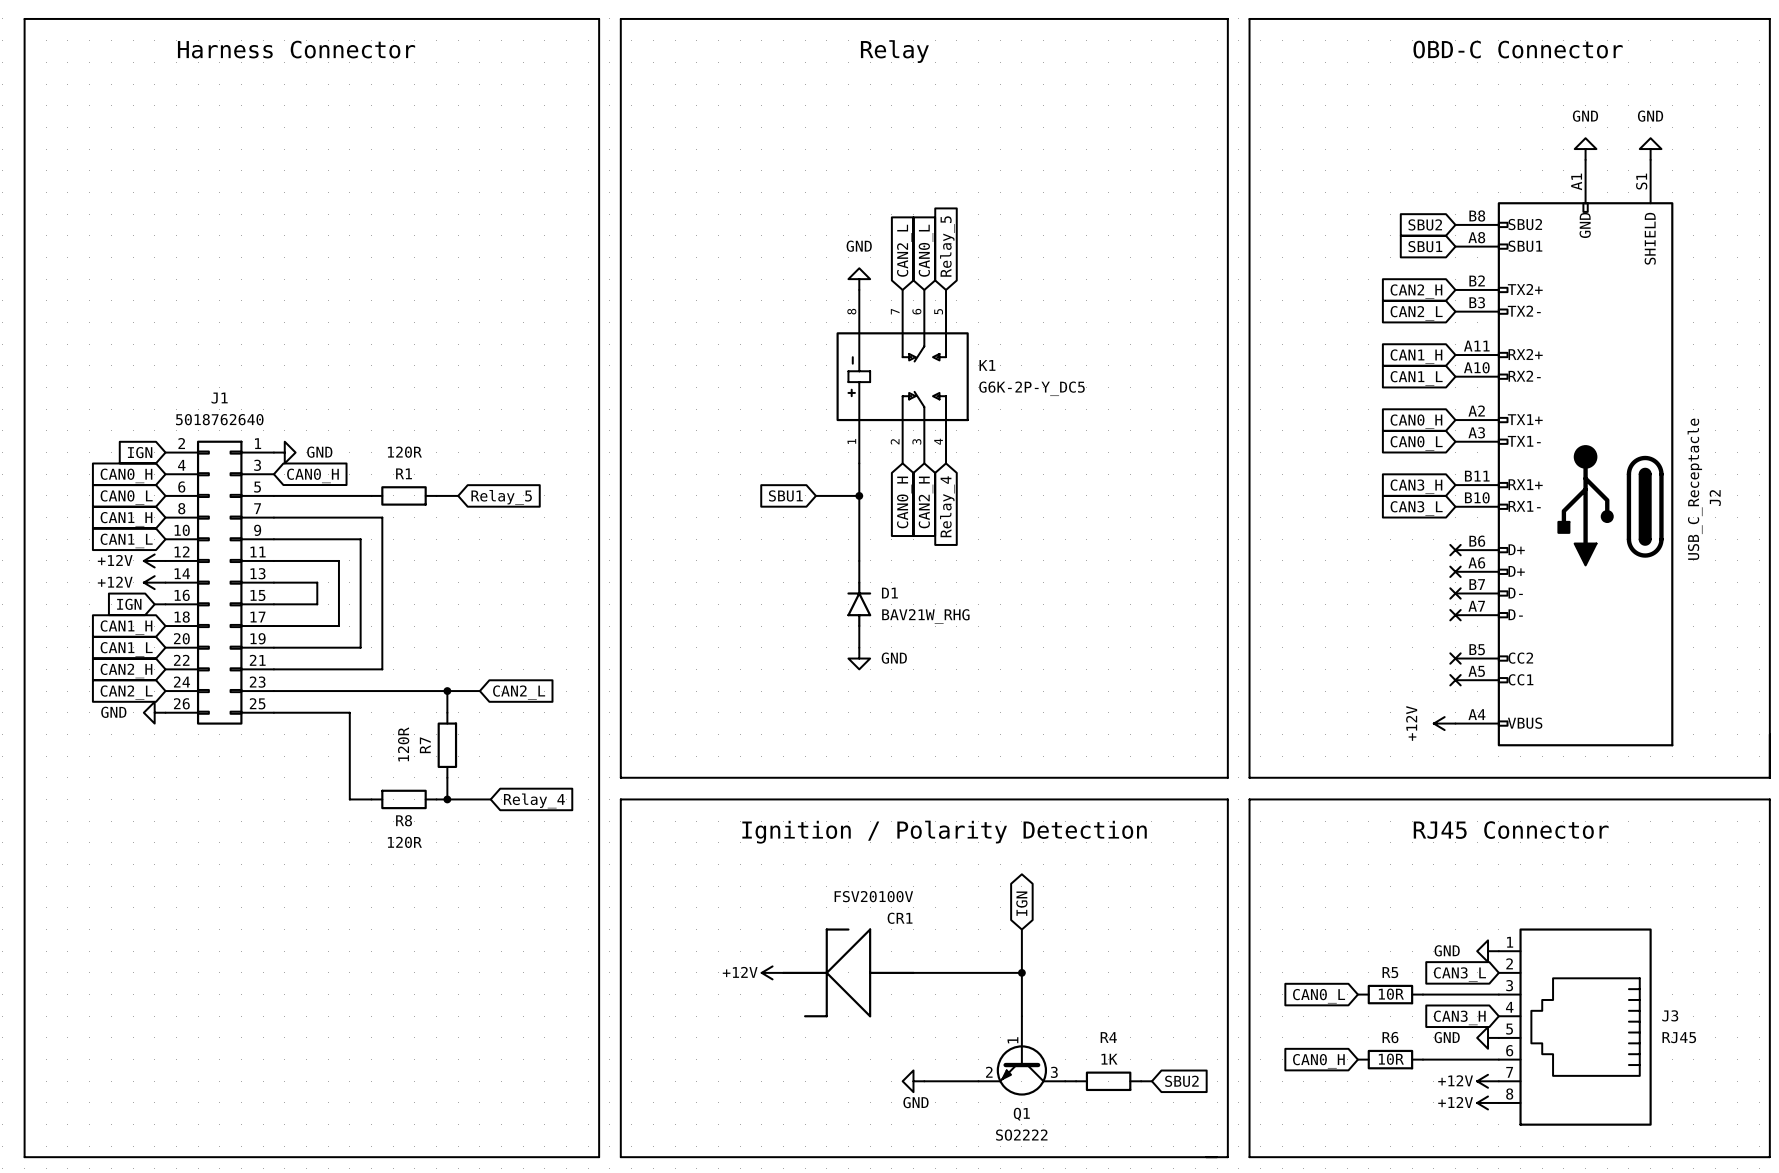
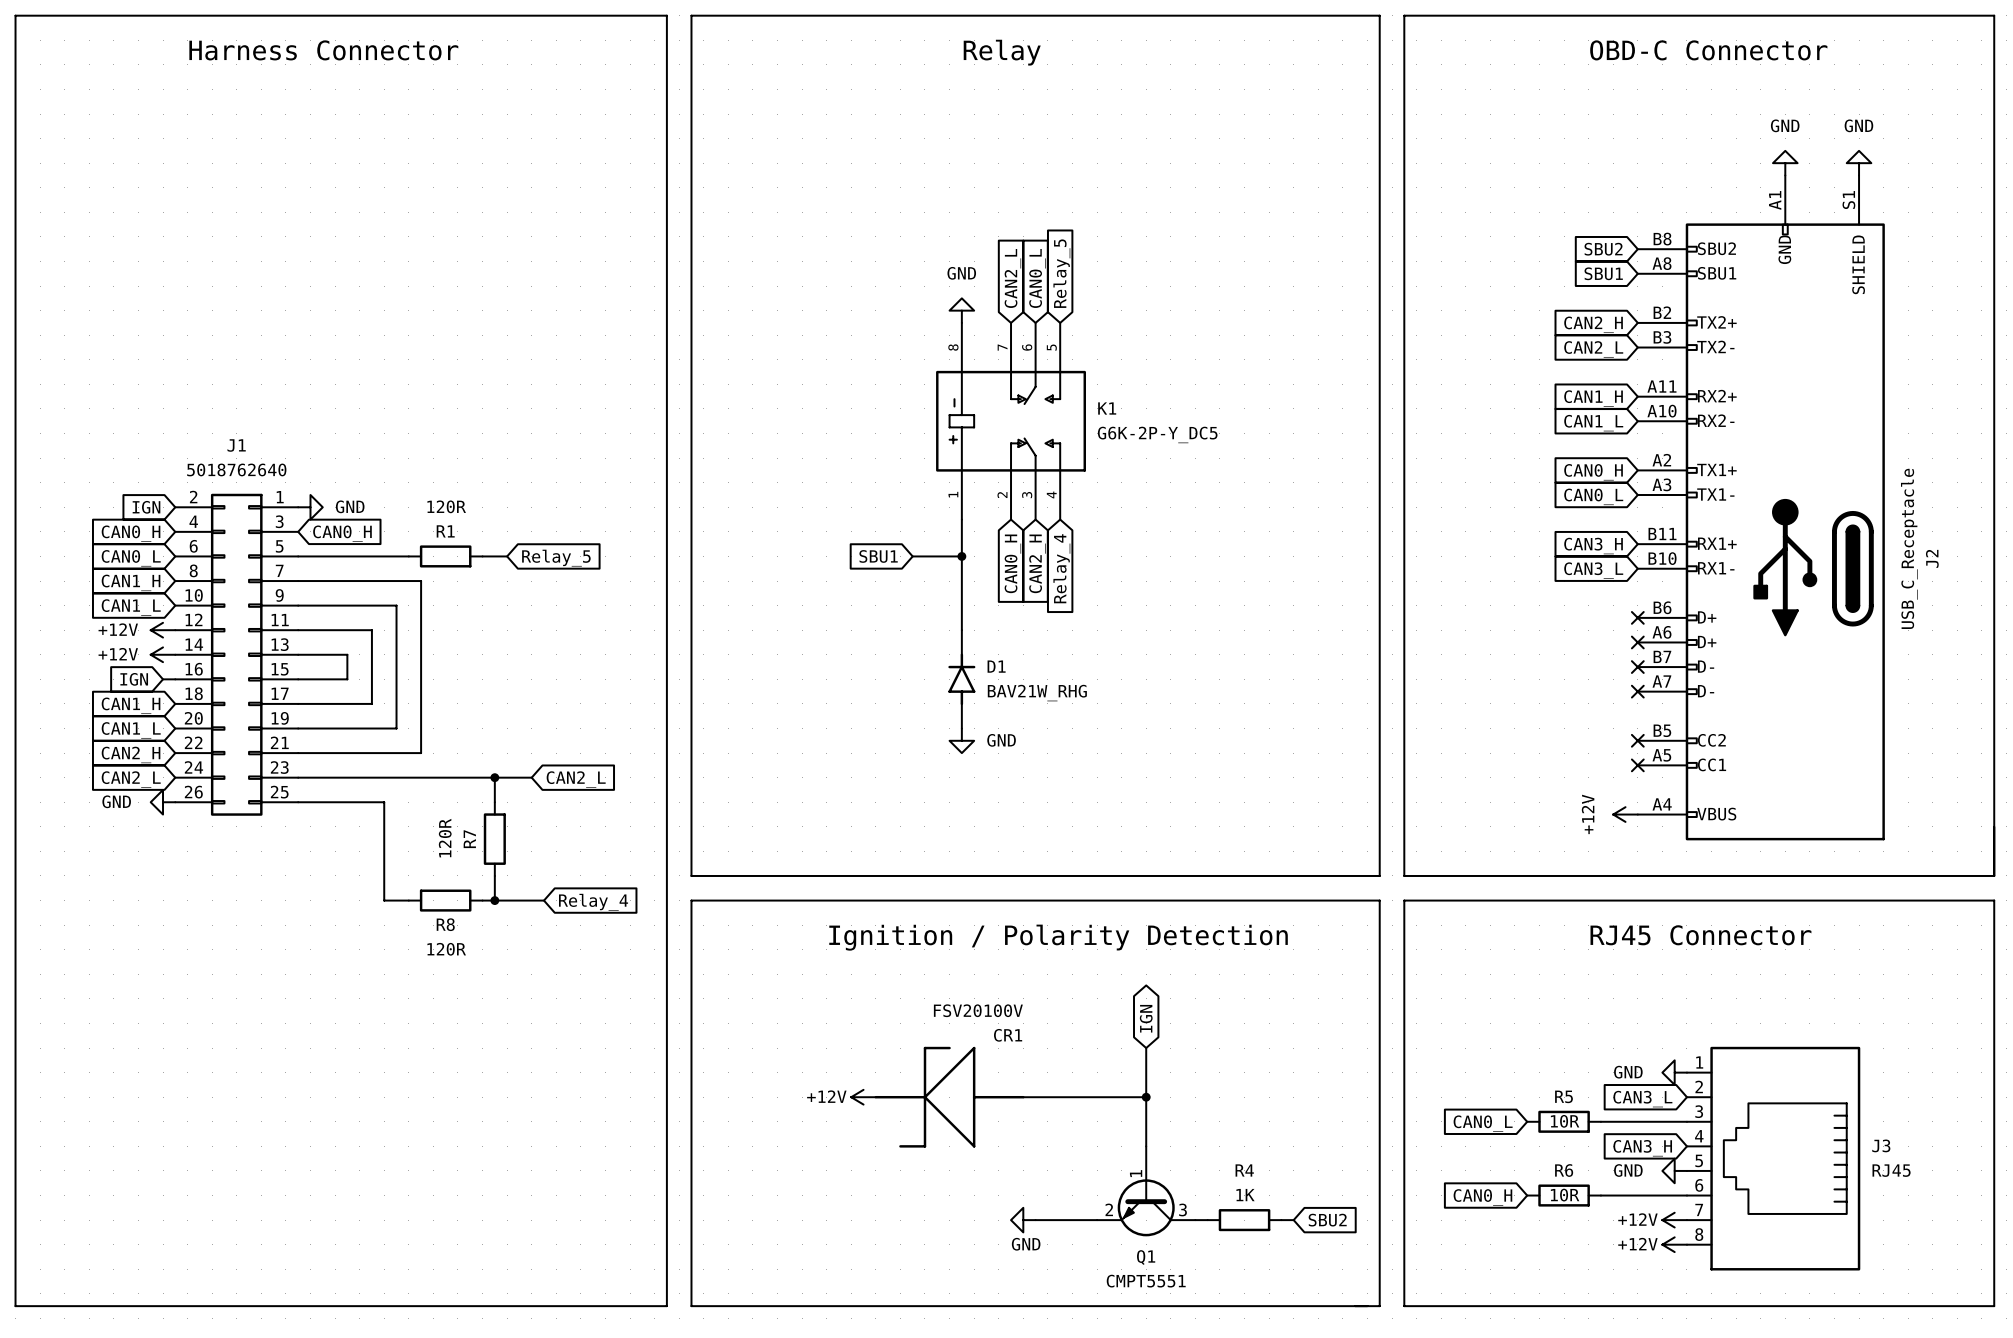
Q1 value: SO2222 (1021, 1135) -> CMPT5551 (1146, 1281)

